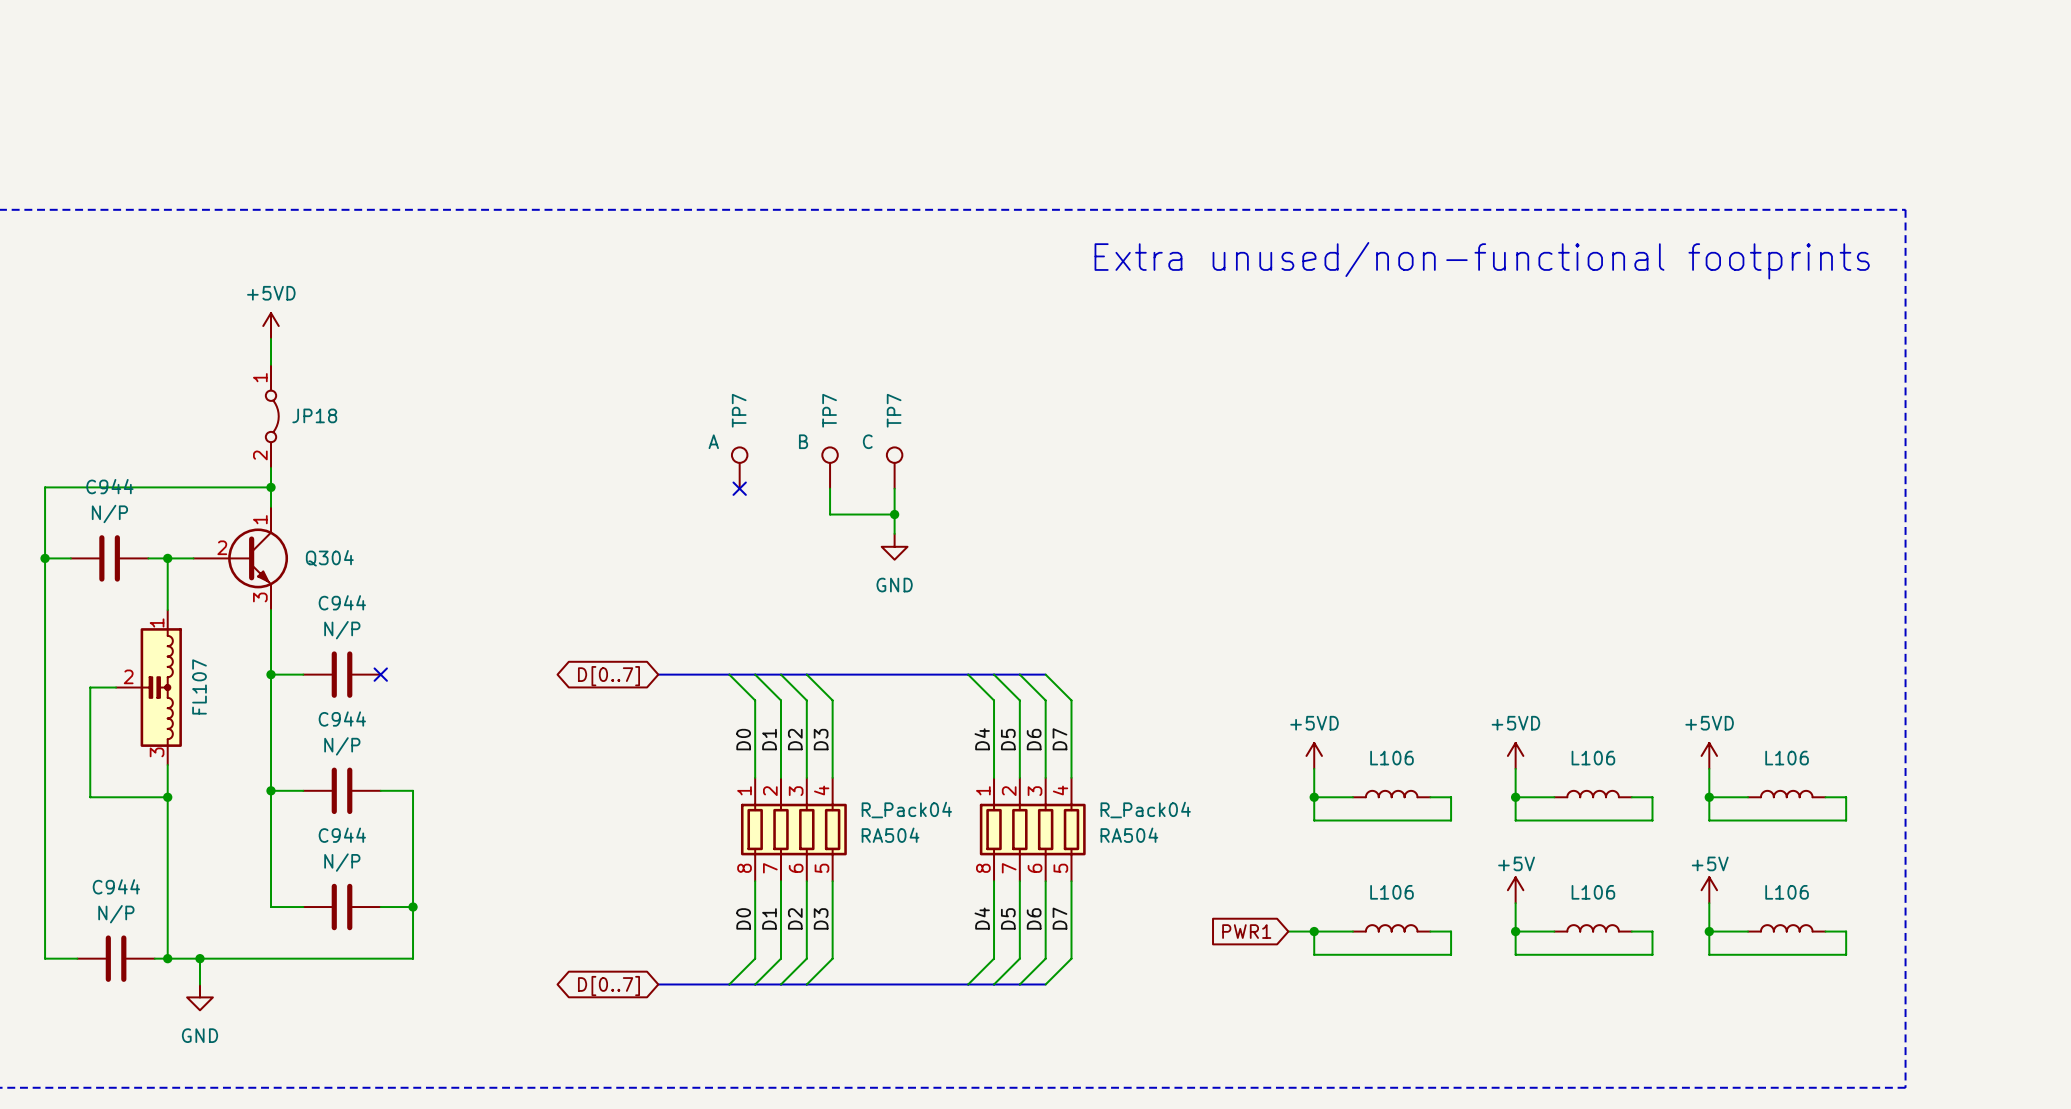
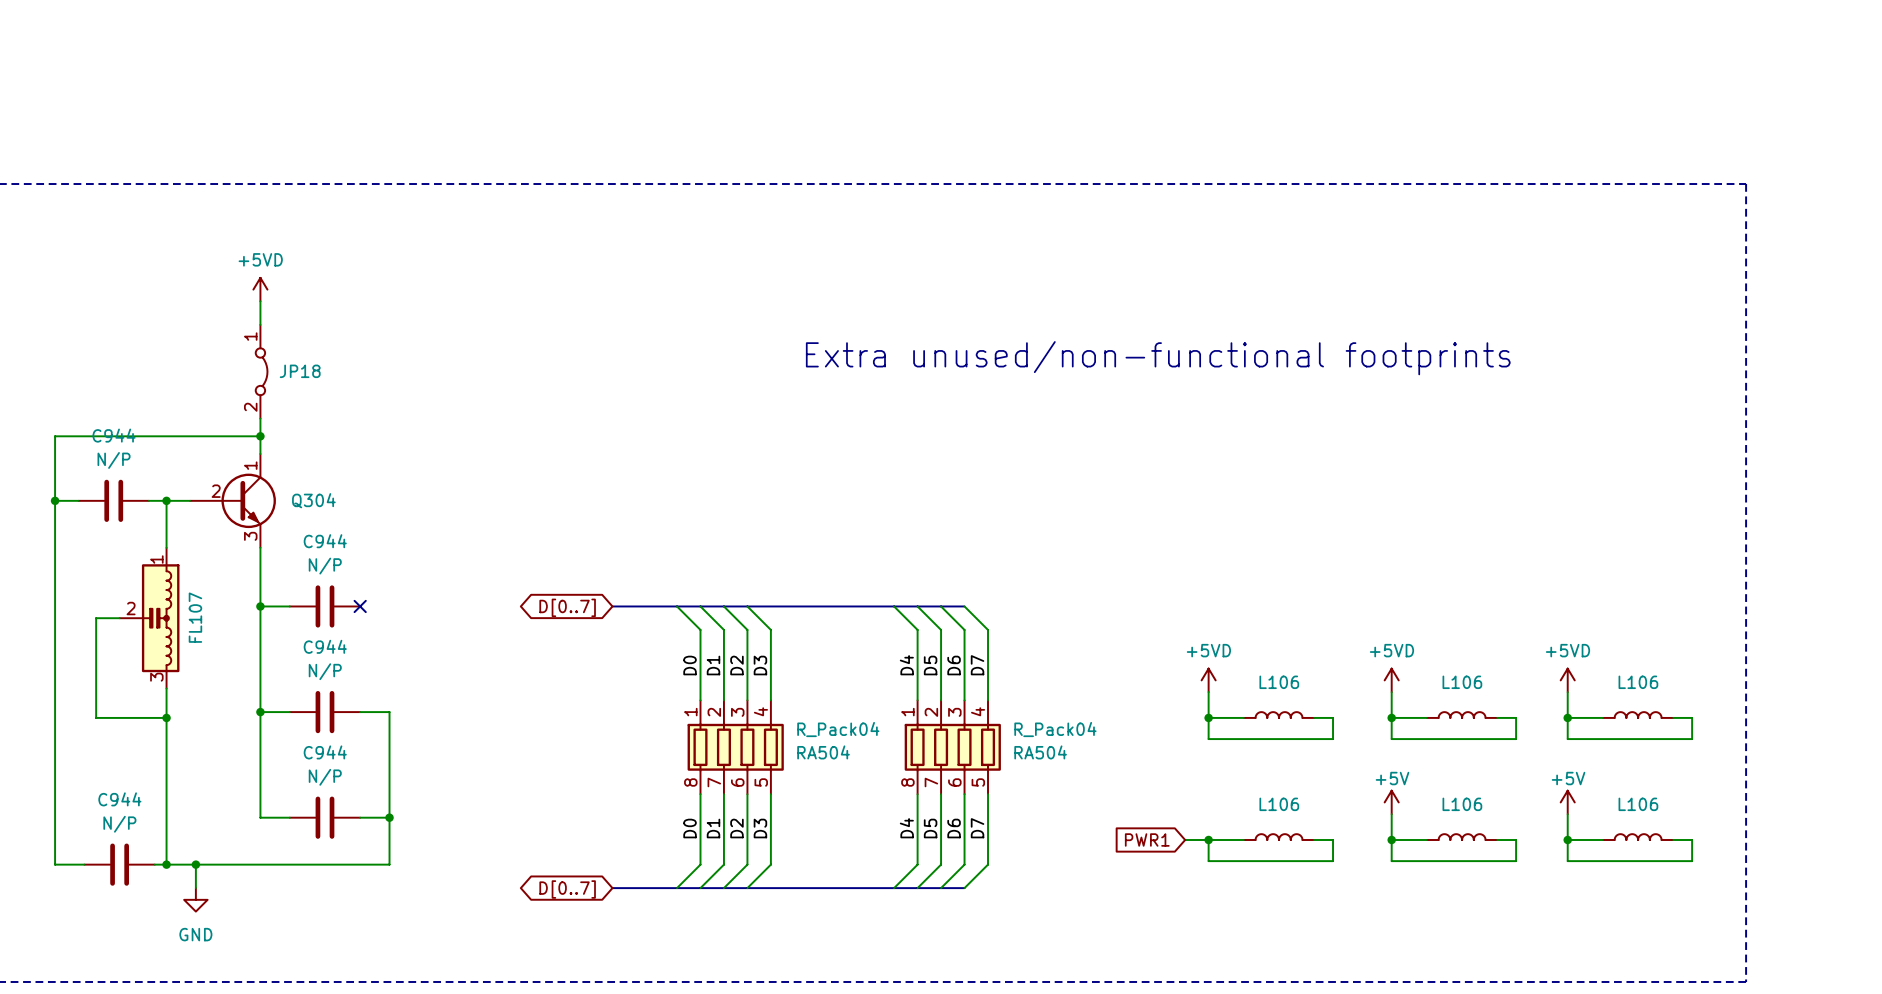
text: Extra unused/non-functional footprints (1482, 260) -> none
text: none -> Extra unused/non-functional footprints (1158, 358)
TP7: A (739, 468) -> none
TP7: B (830, 468) -> none
TP7: C (894, 468) -> none
no-connect mark: (739, 488) -> none
wire: (830, 488) (830, 514) (894, 514) -> none
wire: (894, 488) (894, 533) -> none
junction: (894, 514) -> none
power symbol: GND (894, 546) -> none

